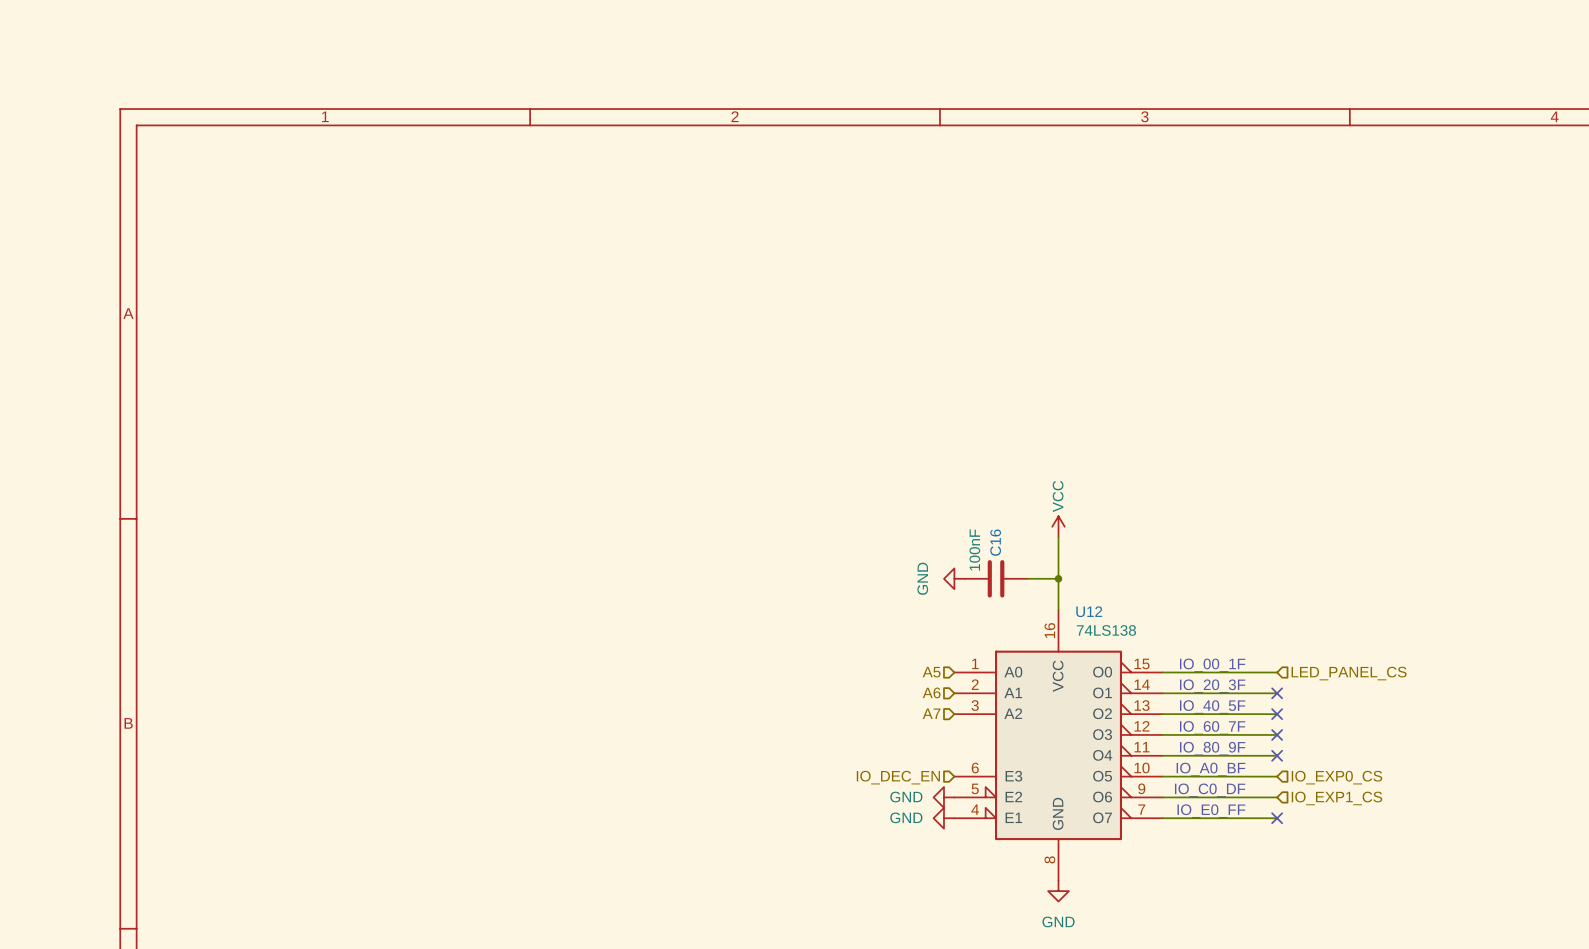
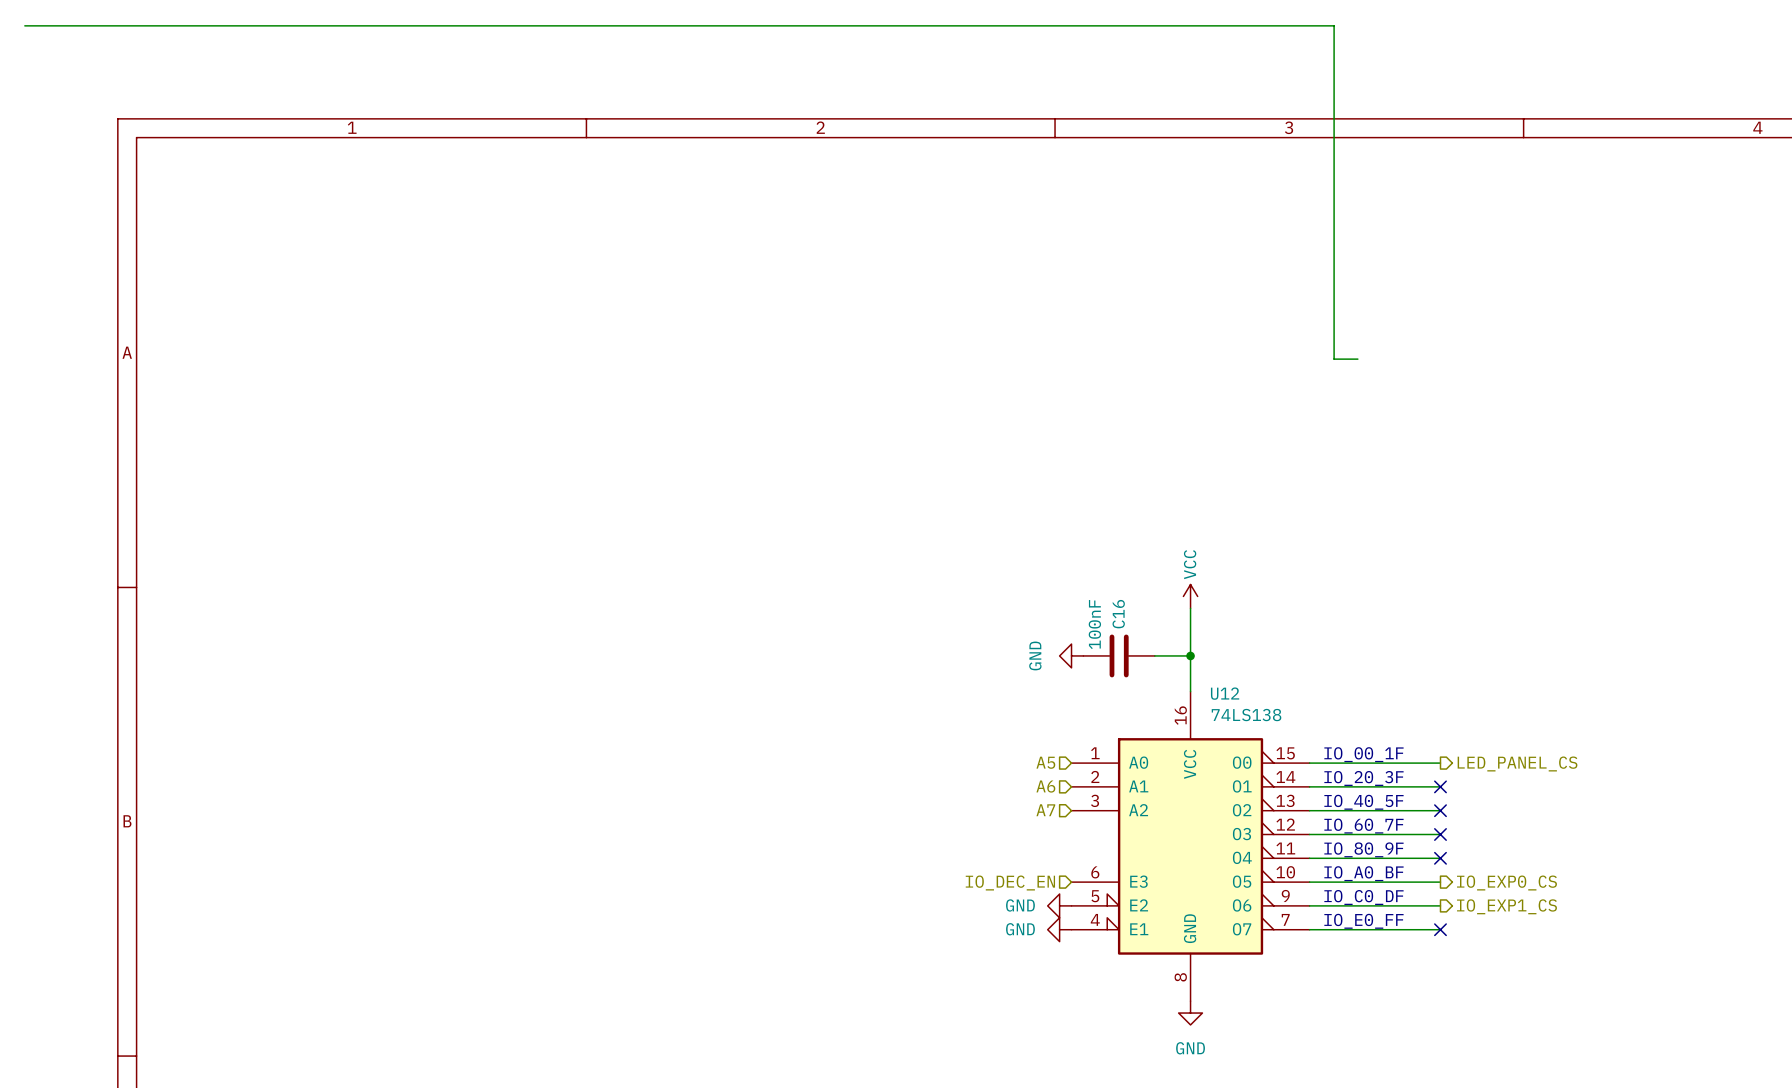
wire: none -> (24, 25) (1334, 25) (1334, 359) (1357, 359)
hierarchical label shape: input (1349, 673) -> output (1517, 763)
hierarchical label shape: input (1336, 777) -> output (1506, 883)
hierarchical label shape: input (1336, 798) -> output (1506, 906)

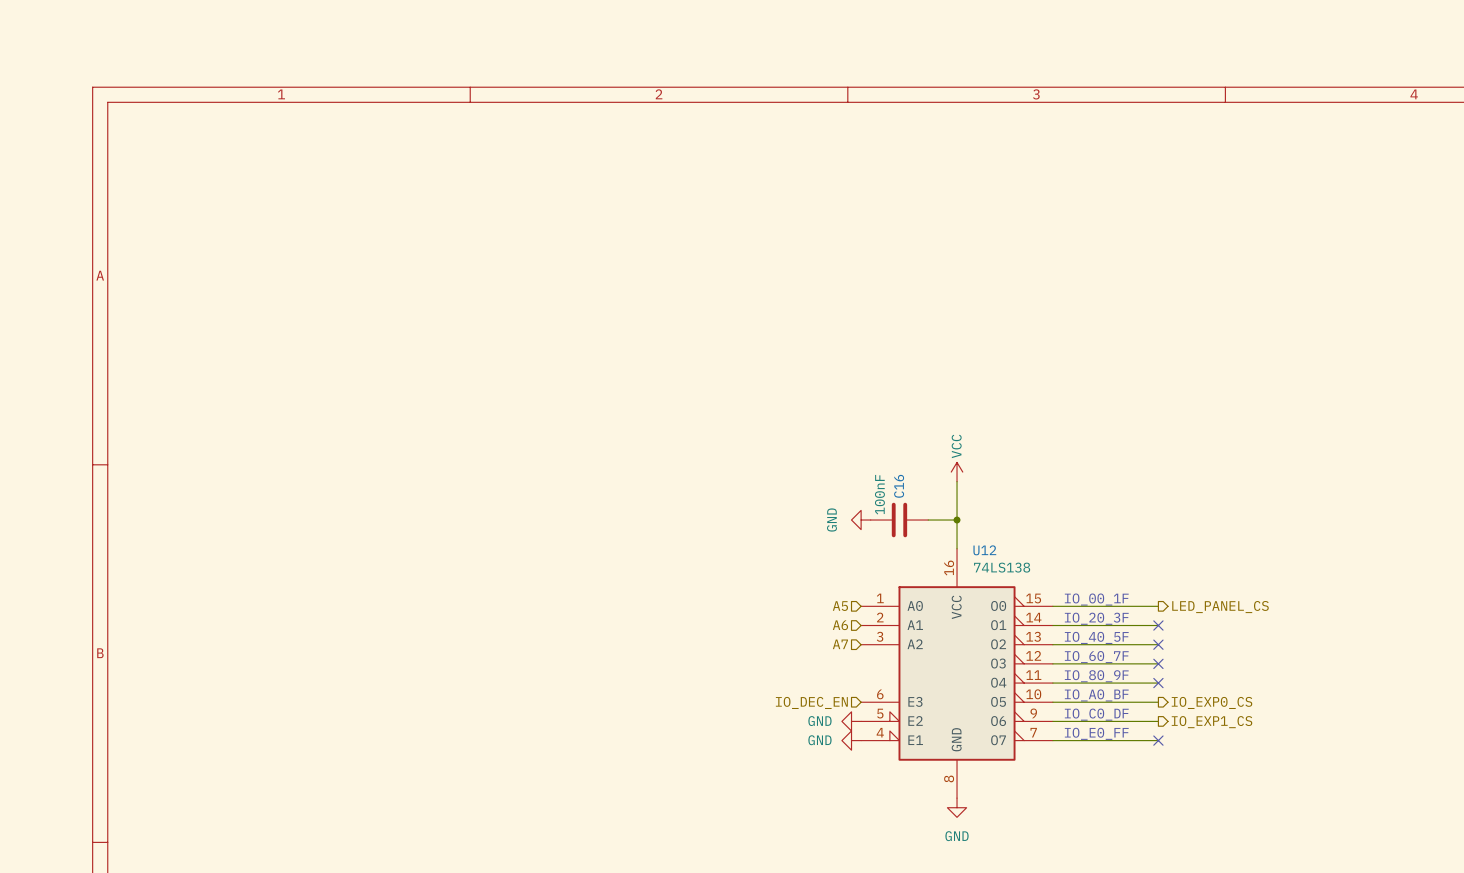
wire: (24, 25) (1334, 25) (1334, 359) (1357, 359) -> none

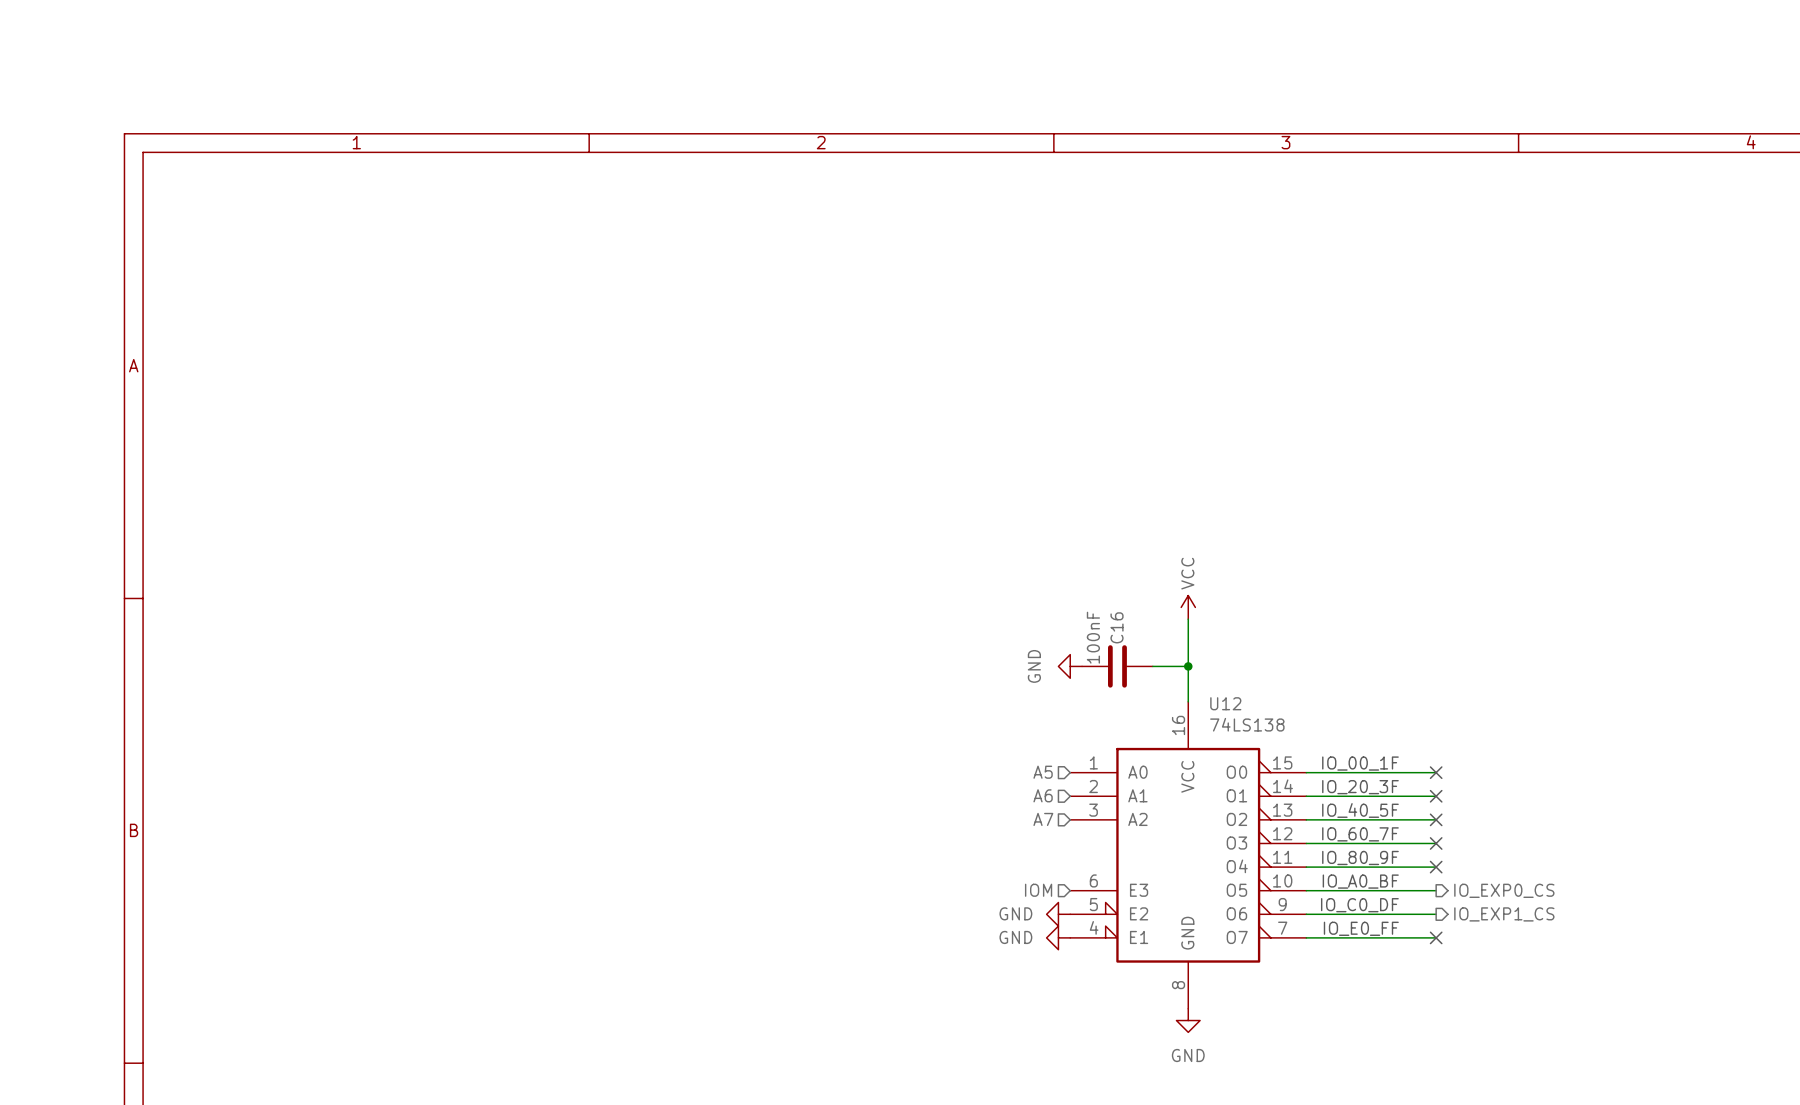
no-connect mark: none -> (1436, 772)
hierarchical label: LED_PANEL_CS (1220, 607) -> none
hierarchical label: IO_DEC_EN (811, 702) -> IOM (1038, 890)

